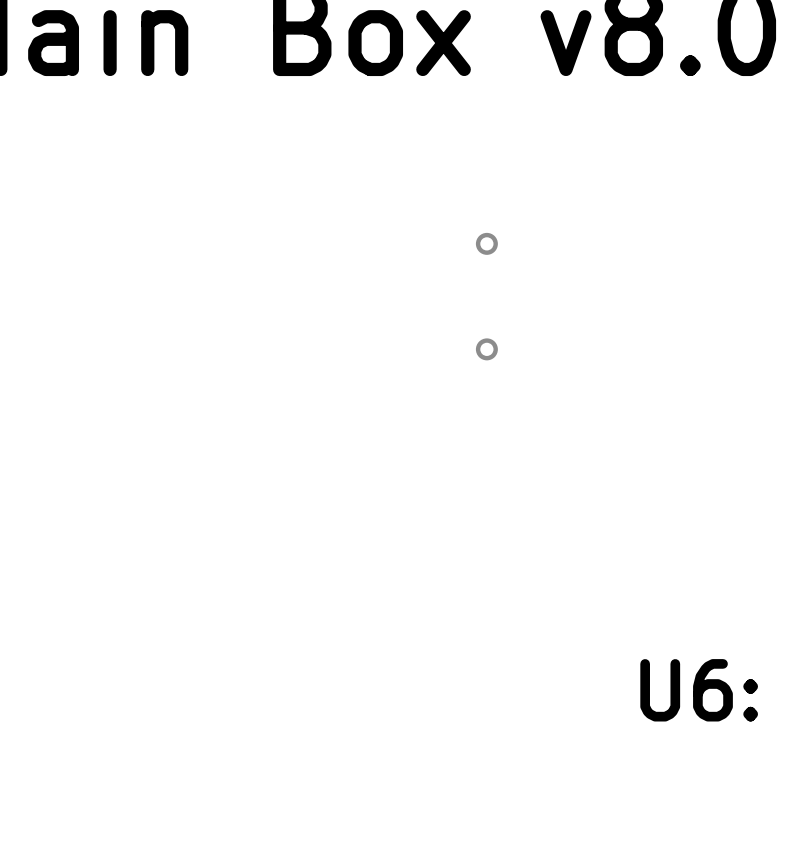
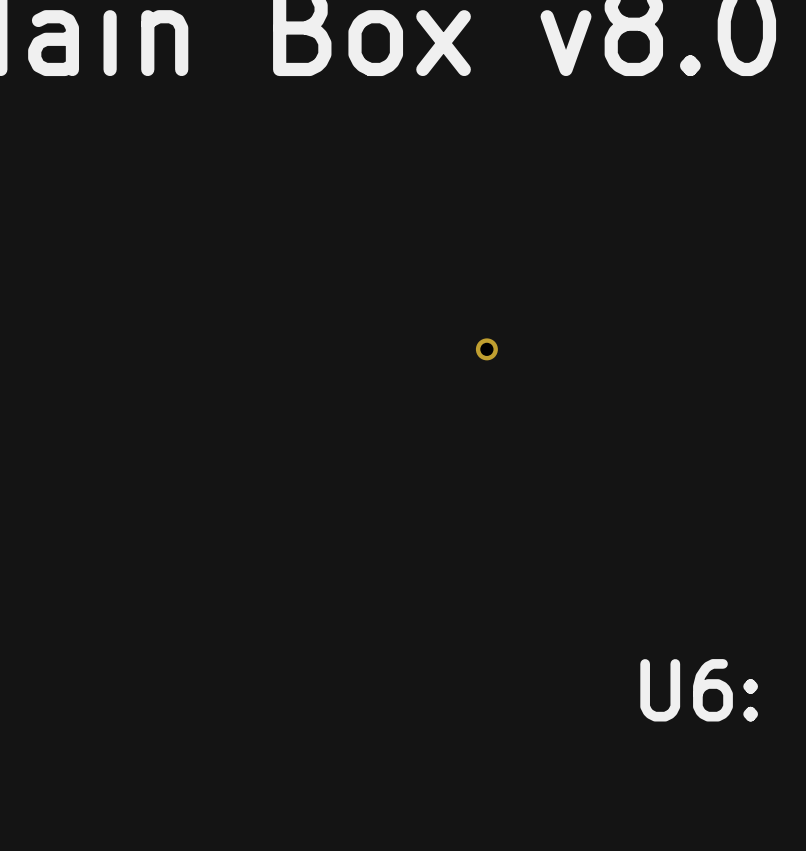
via: (486, 243) -> none

